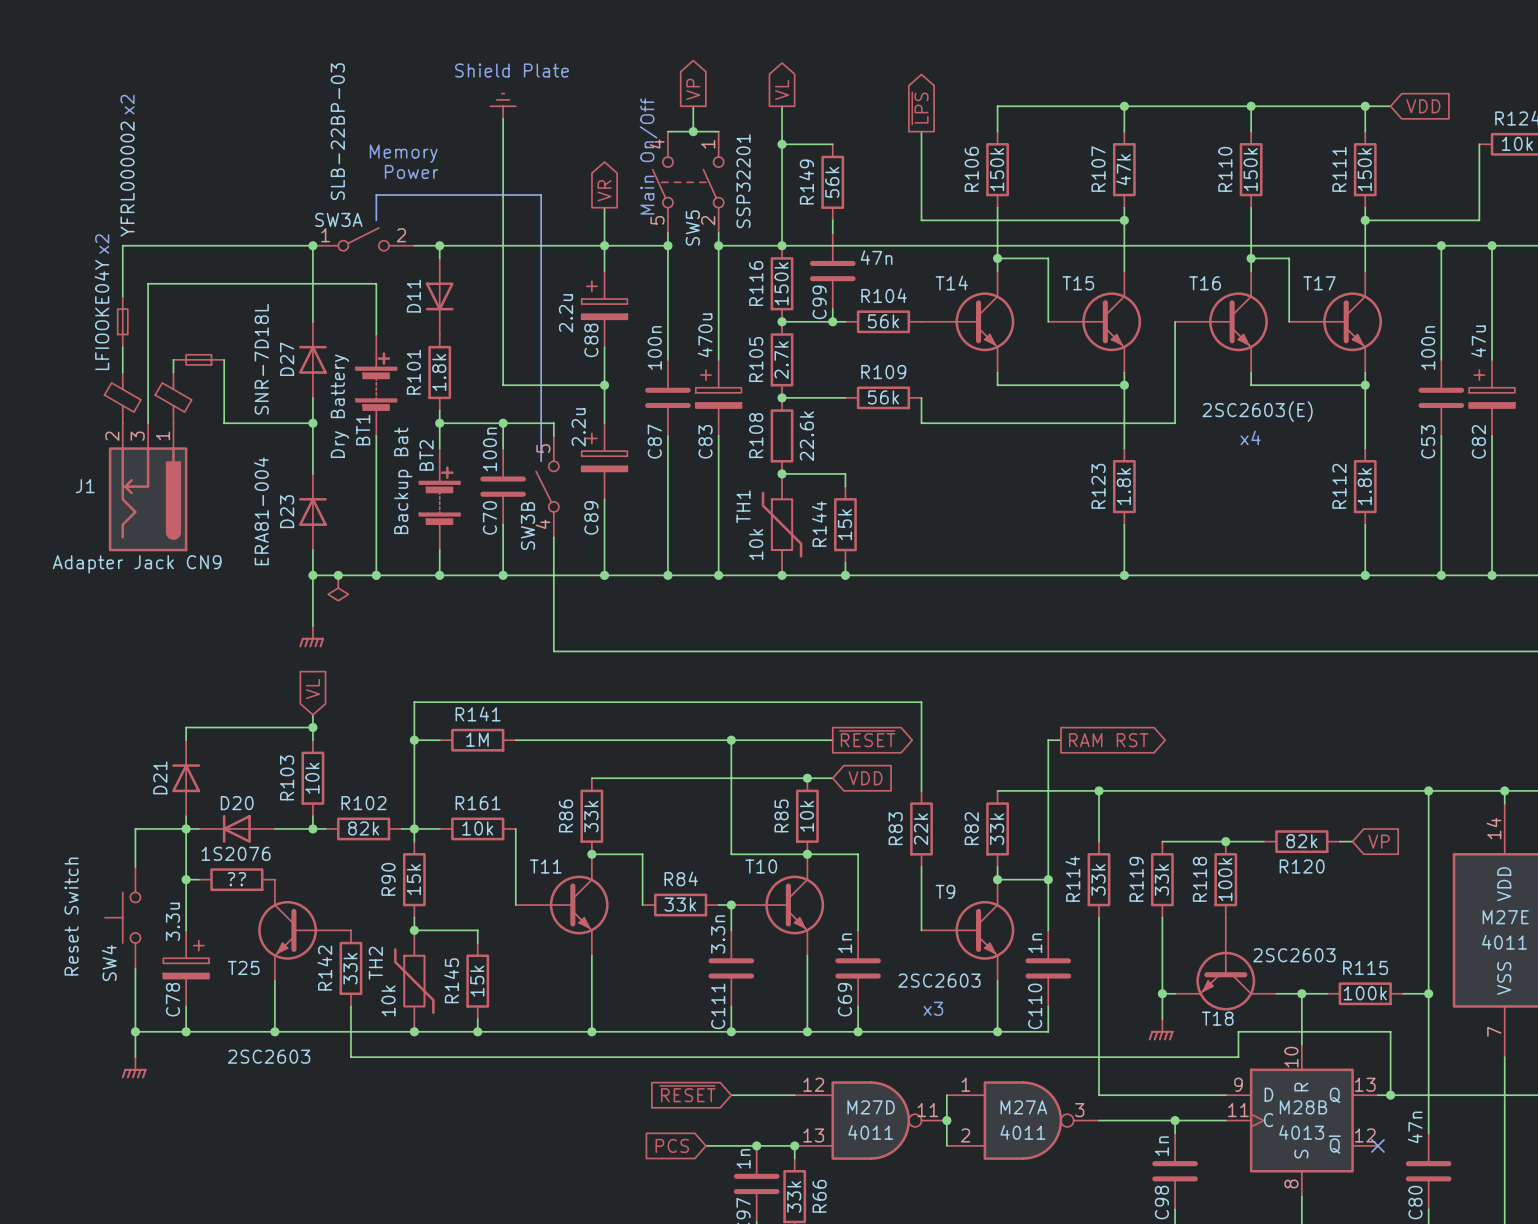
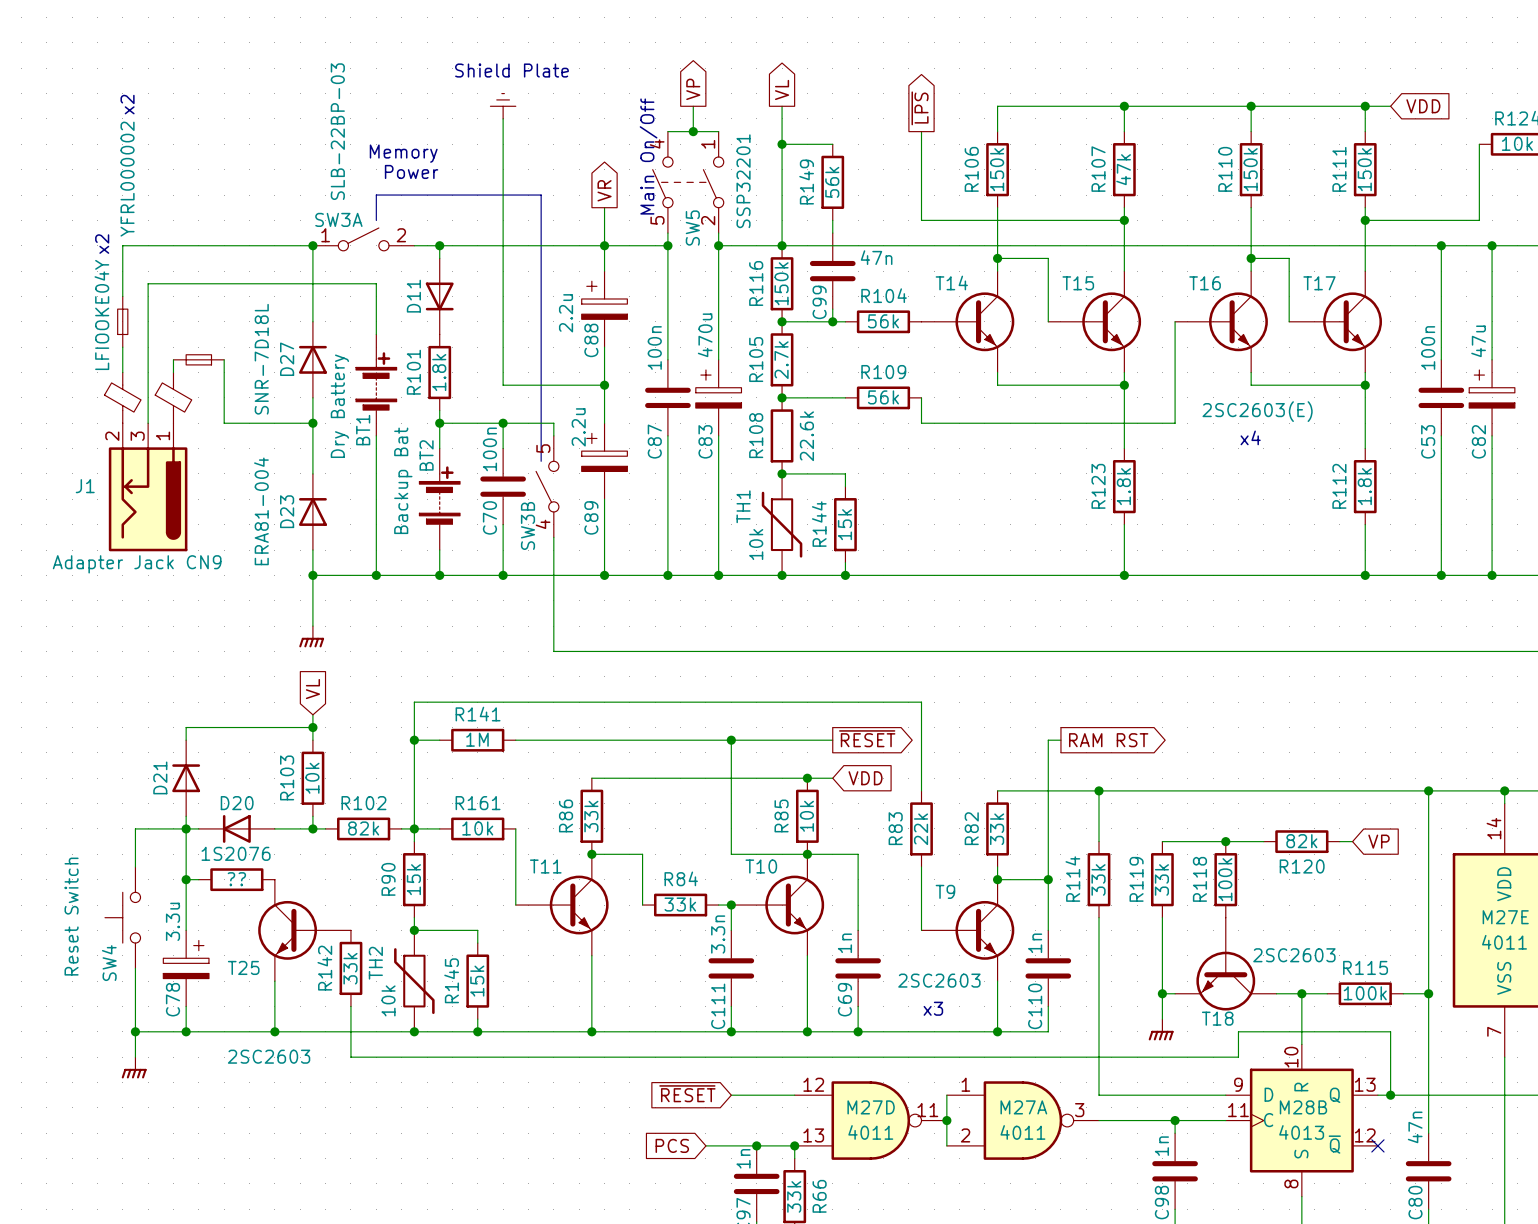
junction: (338, 575) -> none
power symbol: (338, 588) -> none

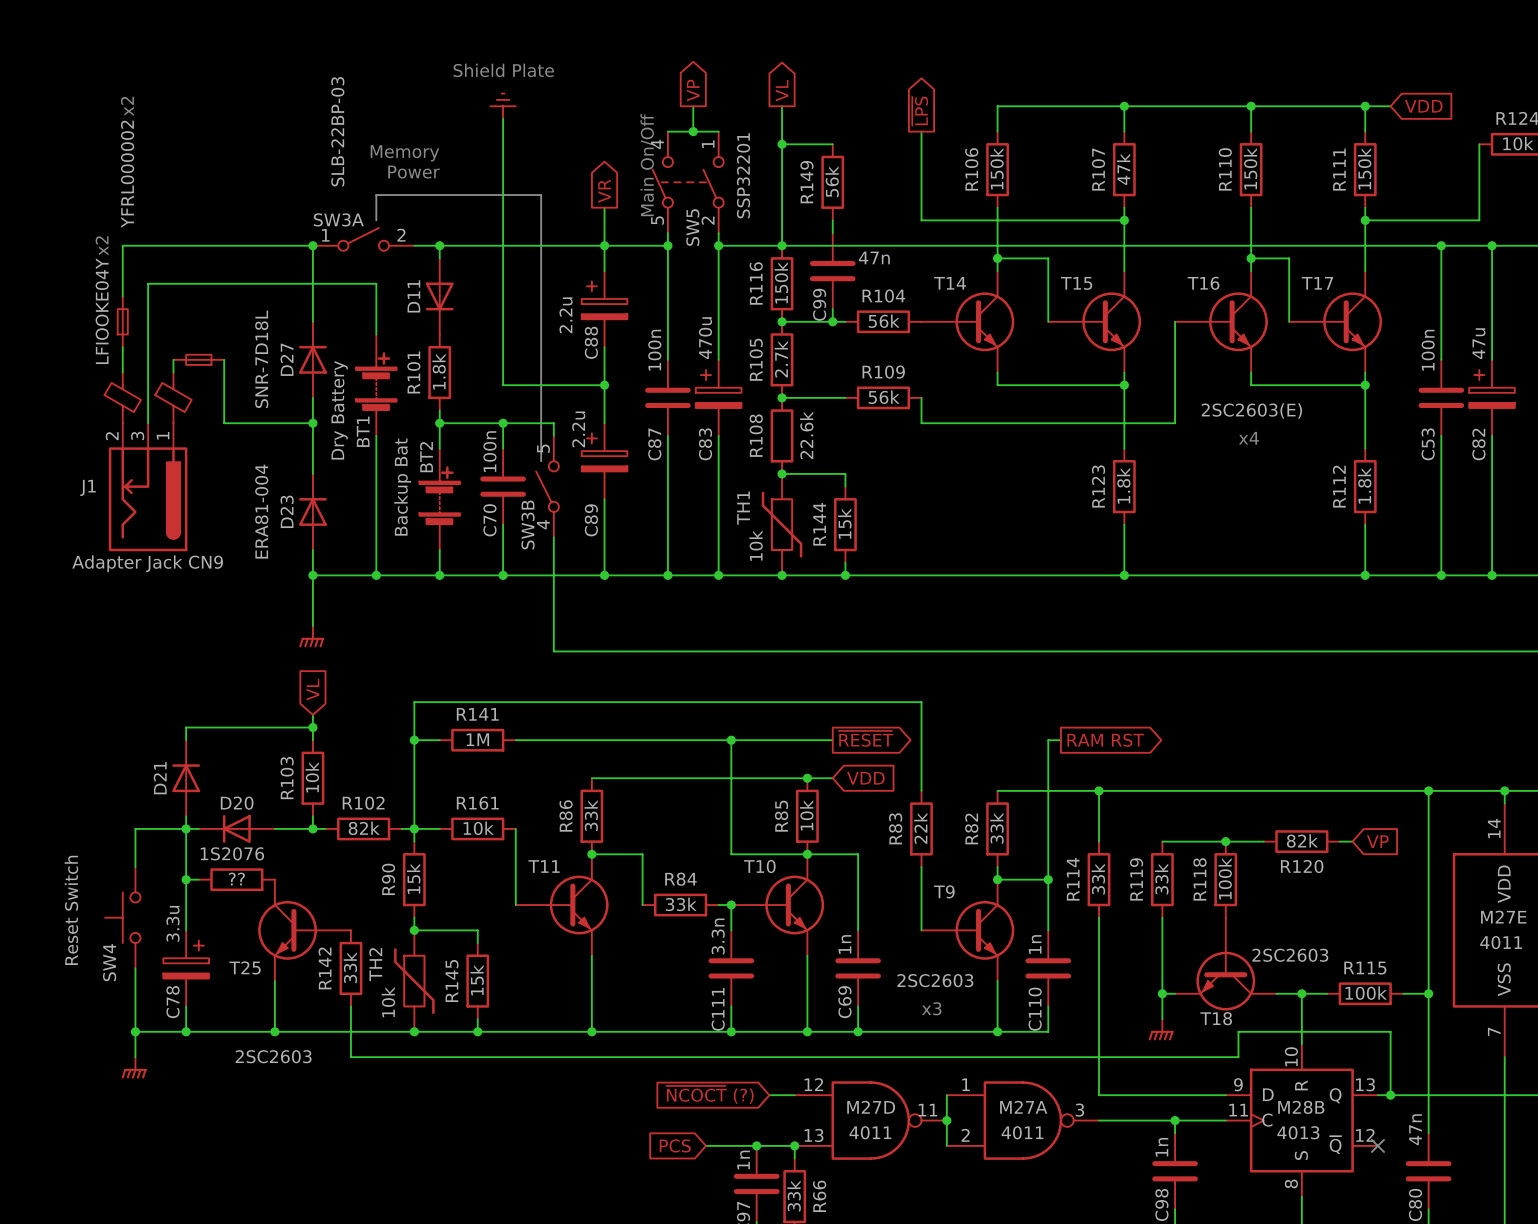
global label: ~{RESET} (687, 1093) -> none
wire: (731, 1095) (769, 1095) -> none
global label: none -> ~{NCOCT} (?) (710, 1094)

